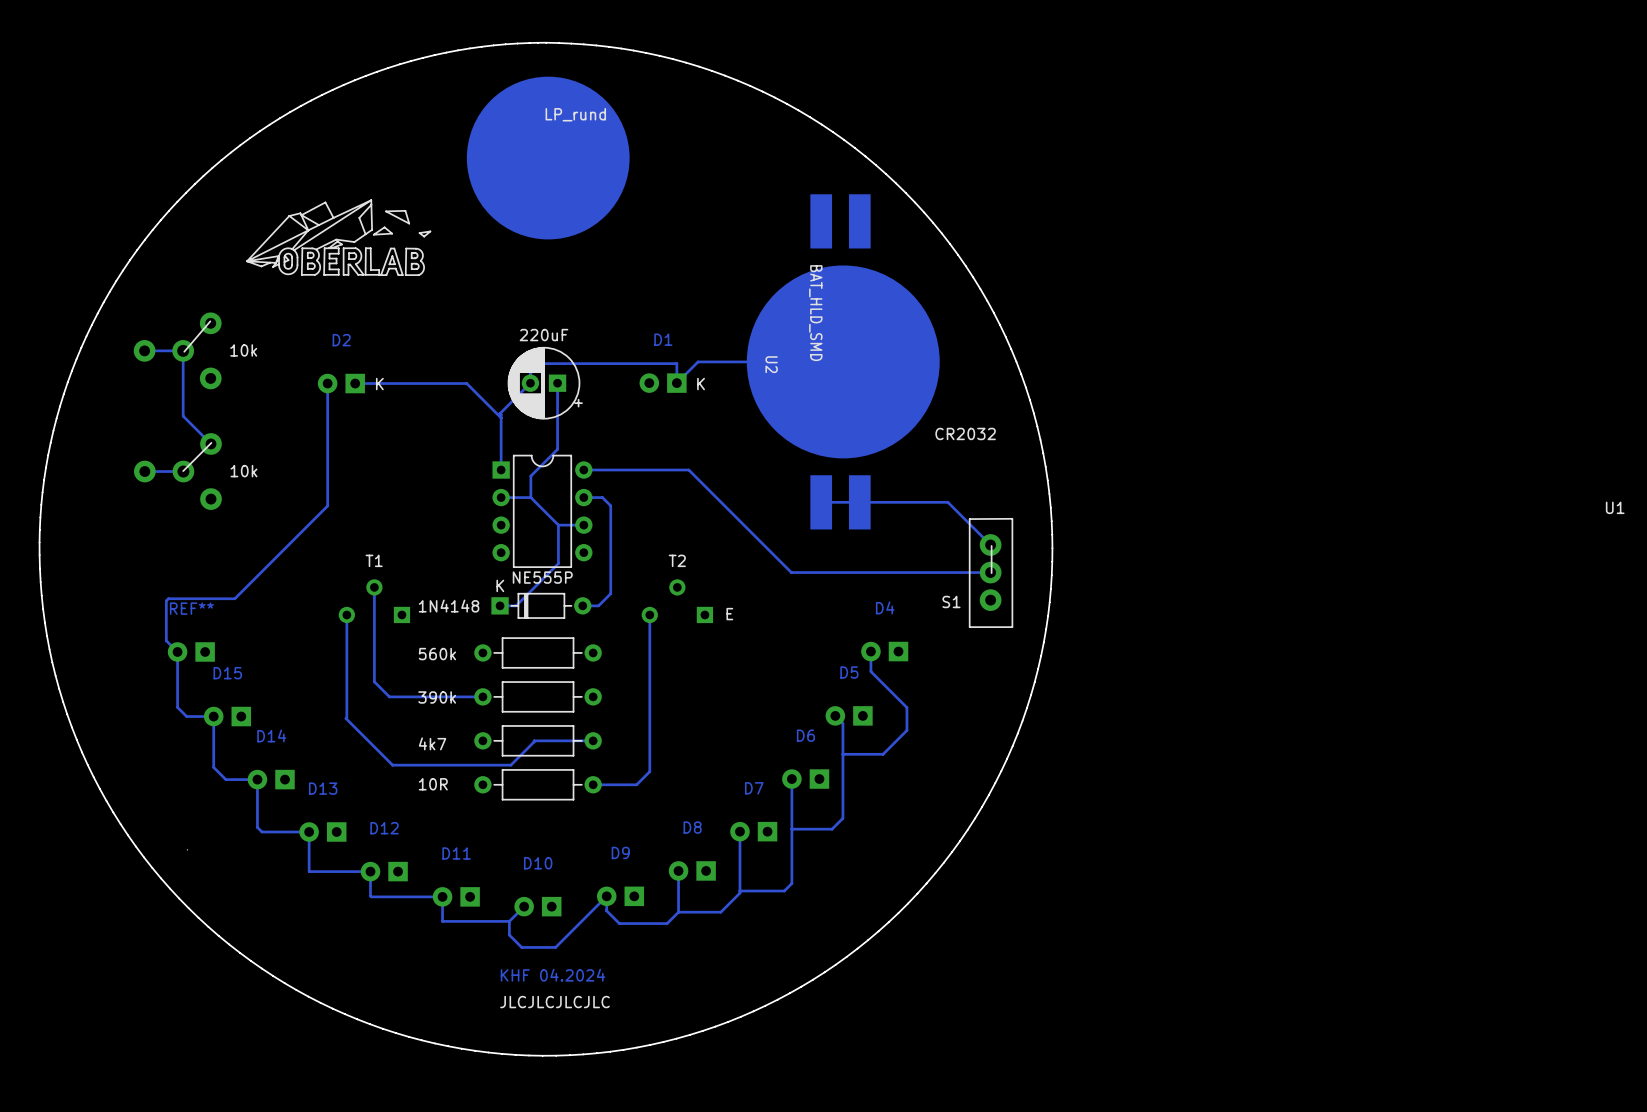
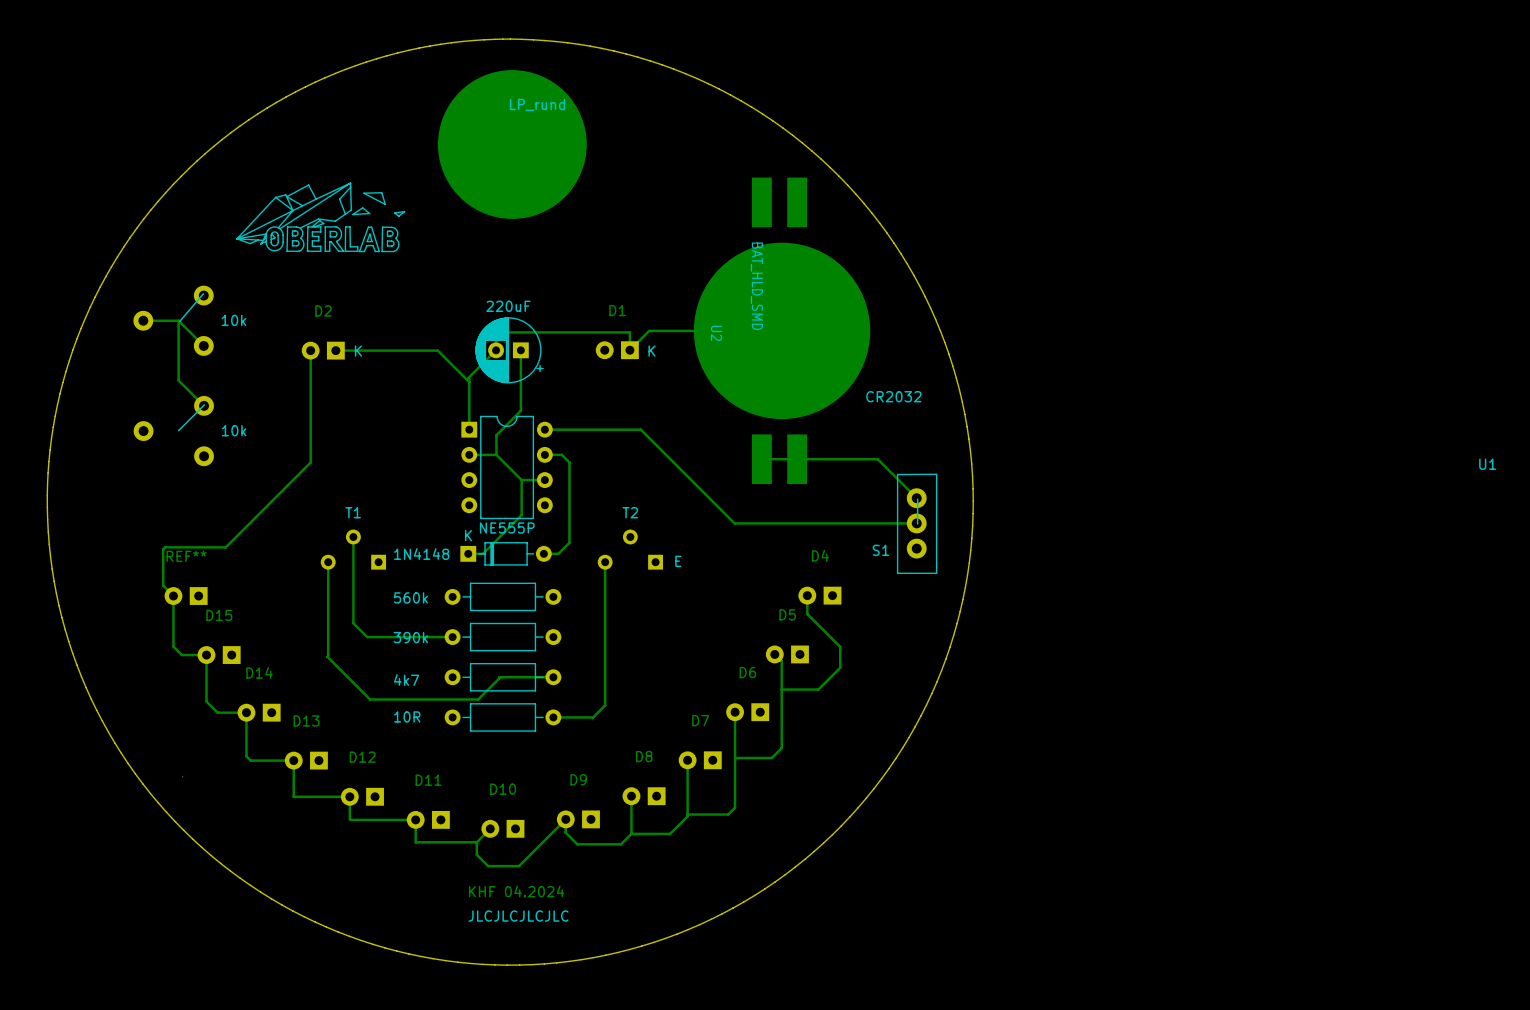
part footprint: [133, 312, 222, 390] -> [133, 285, 214, 356]
track: none -> (178, 320) (203, 345)
part footprint: [134, 433, 222, 510] -> [133, 395, 214, 467]
track: (183, 471) (144, 471) -> none

